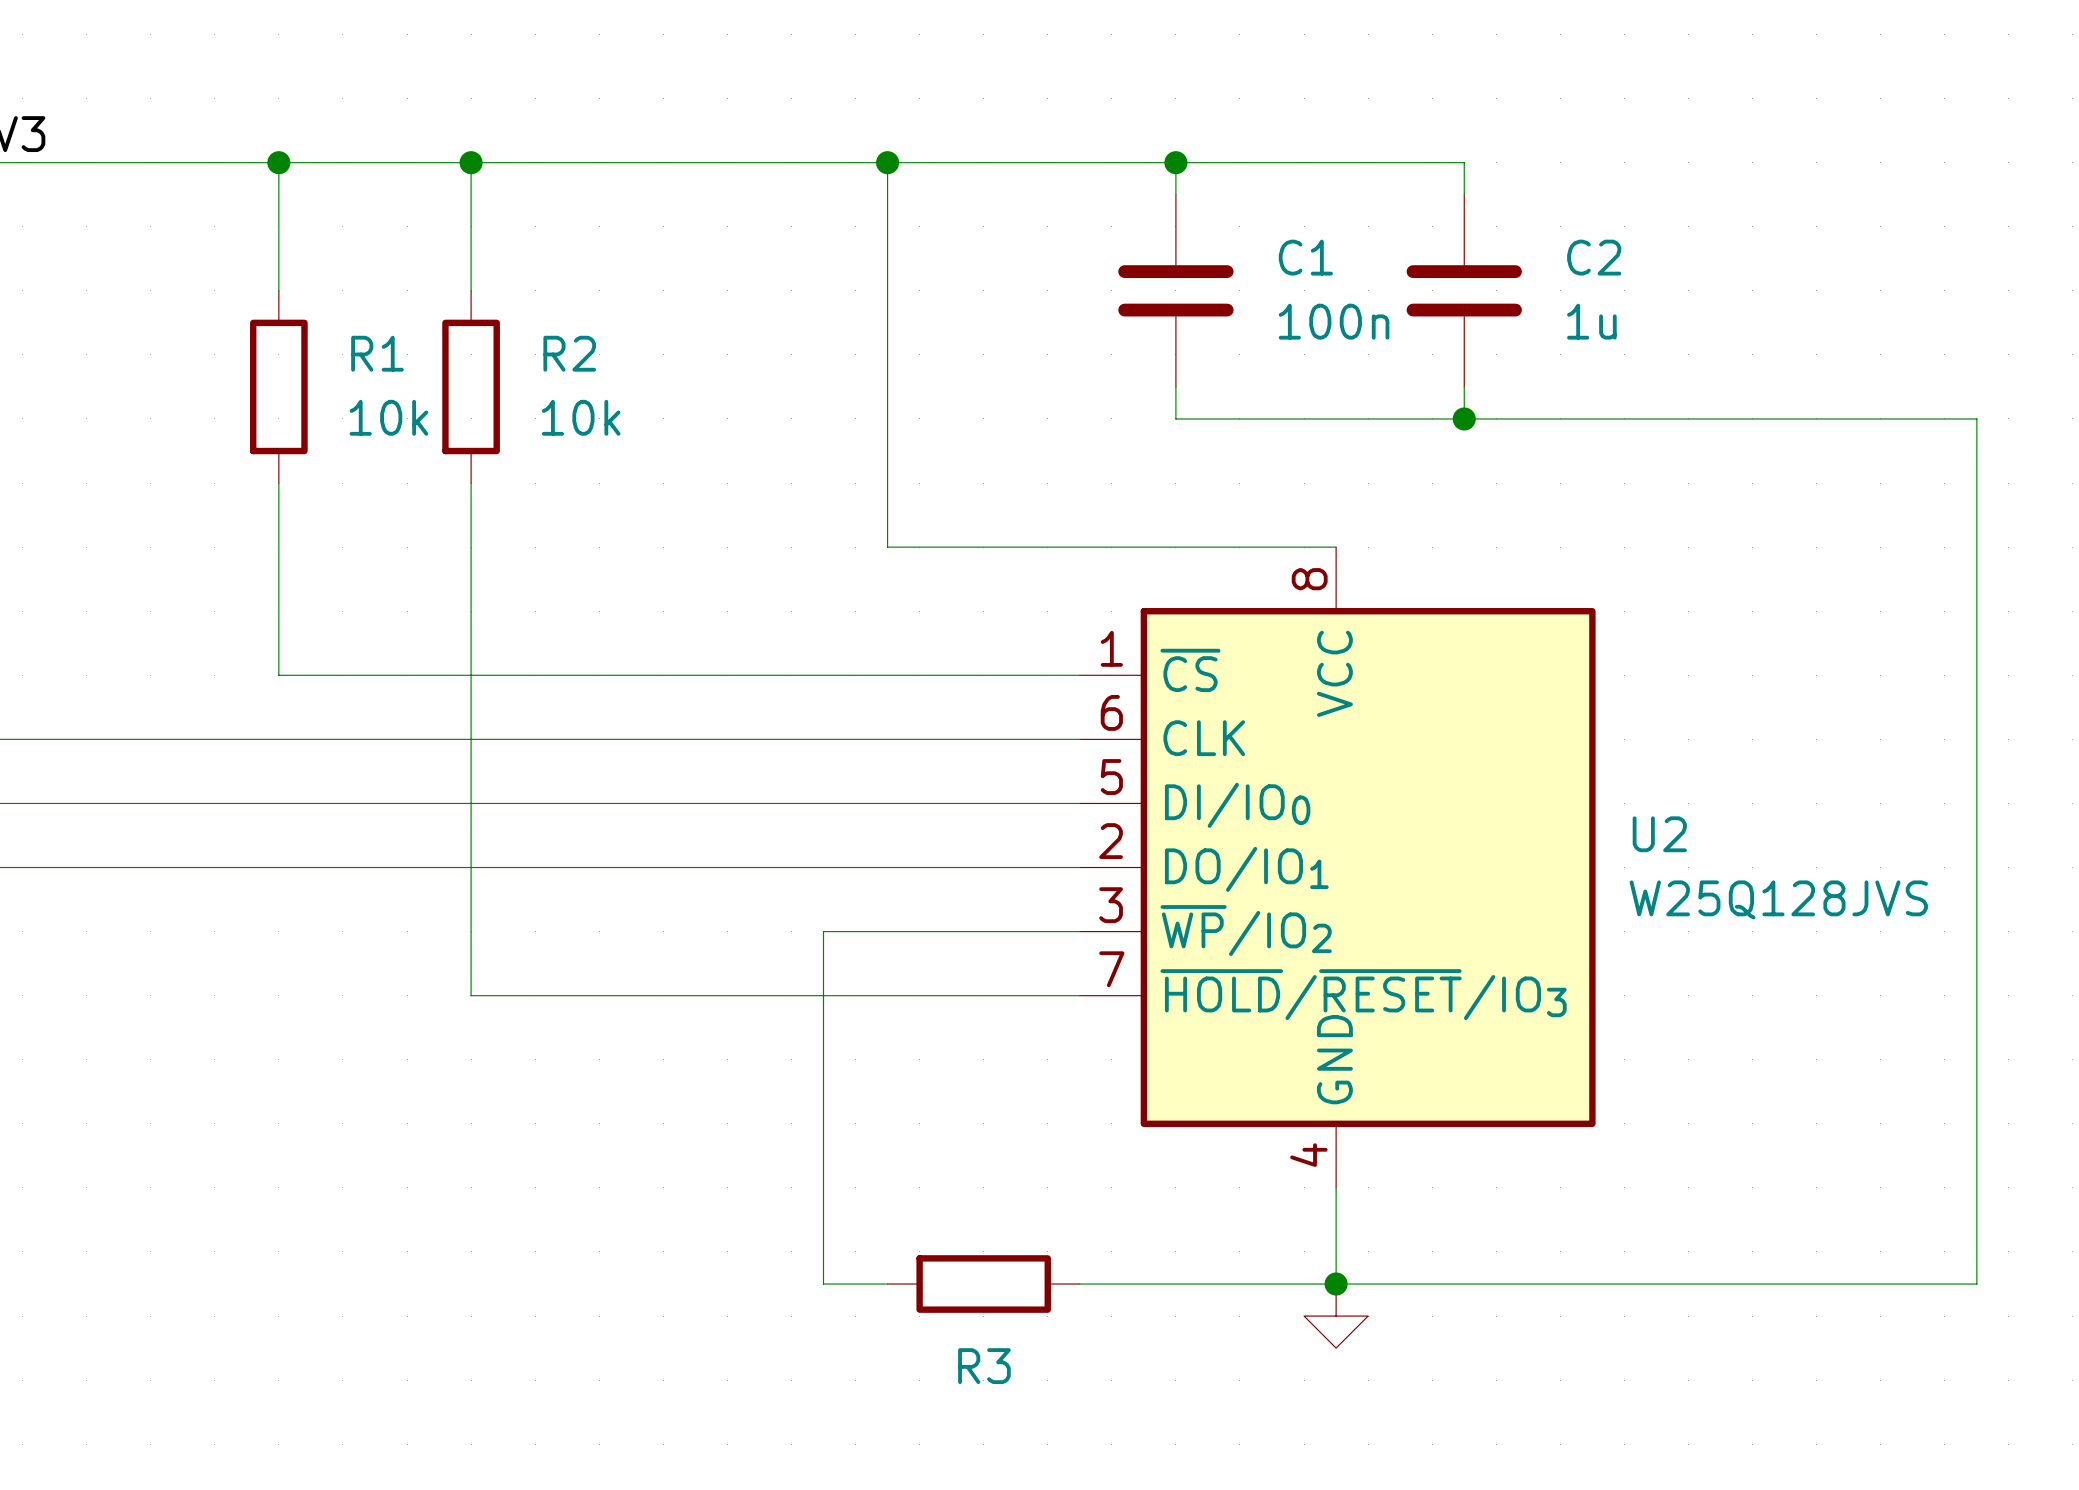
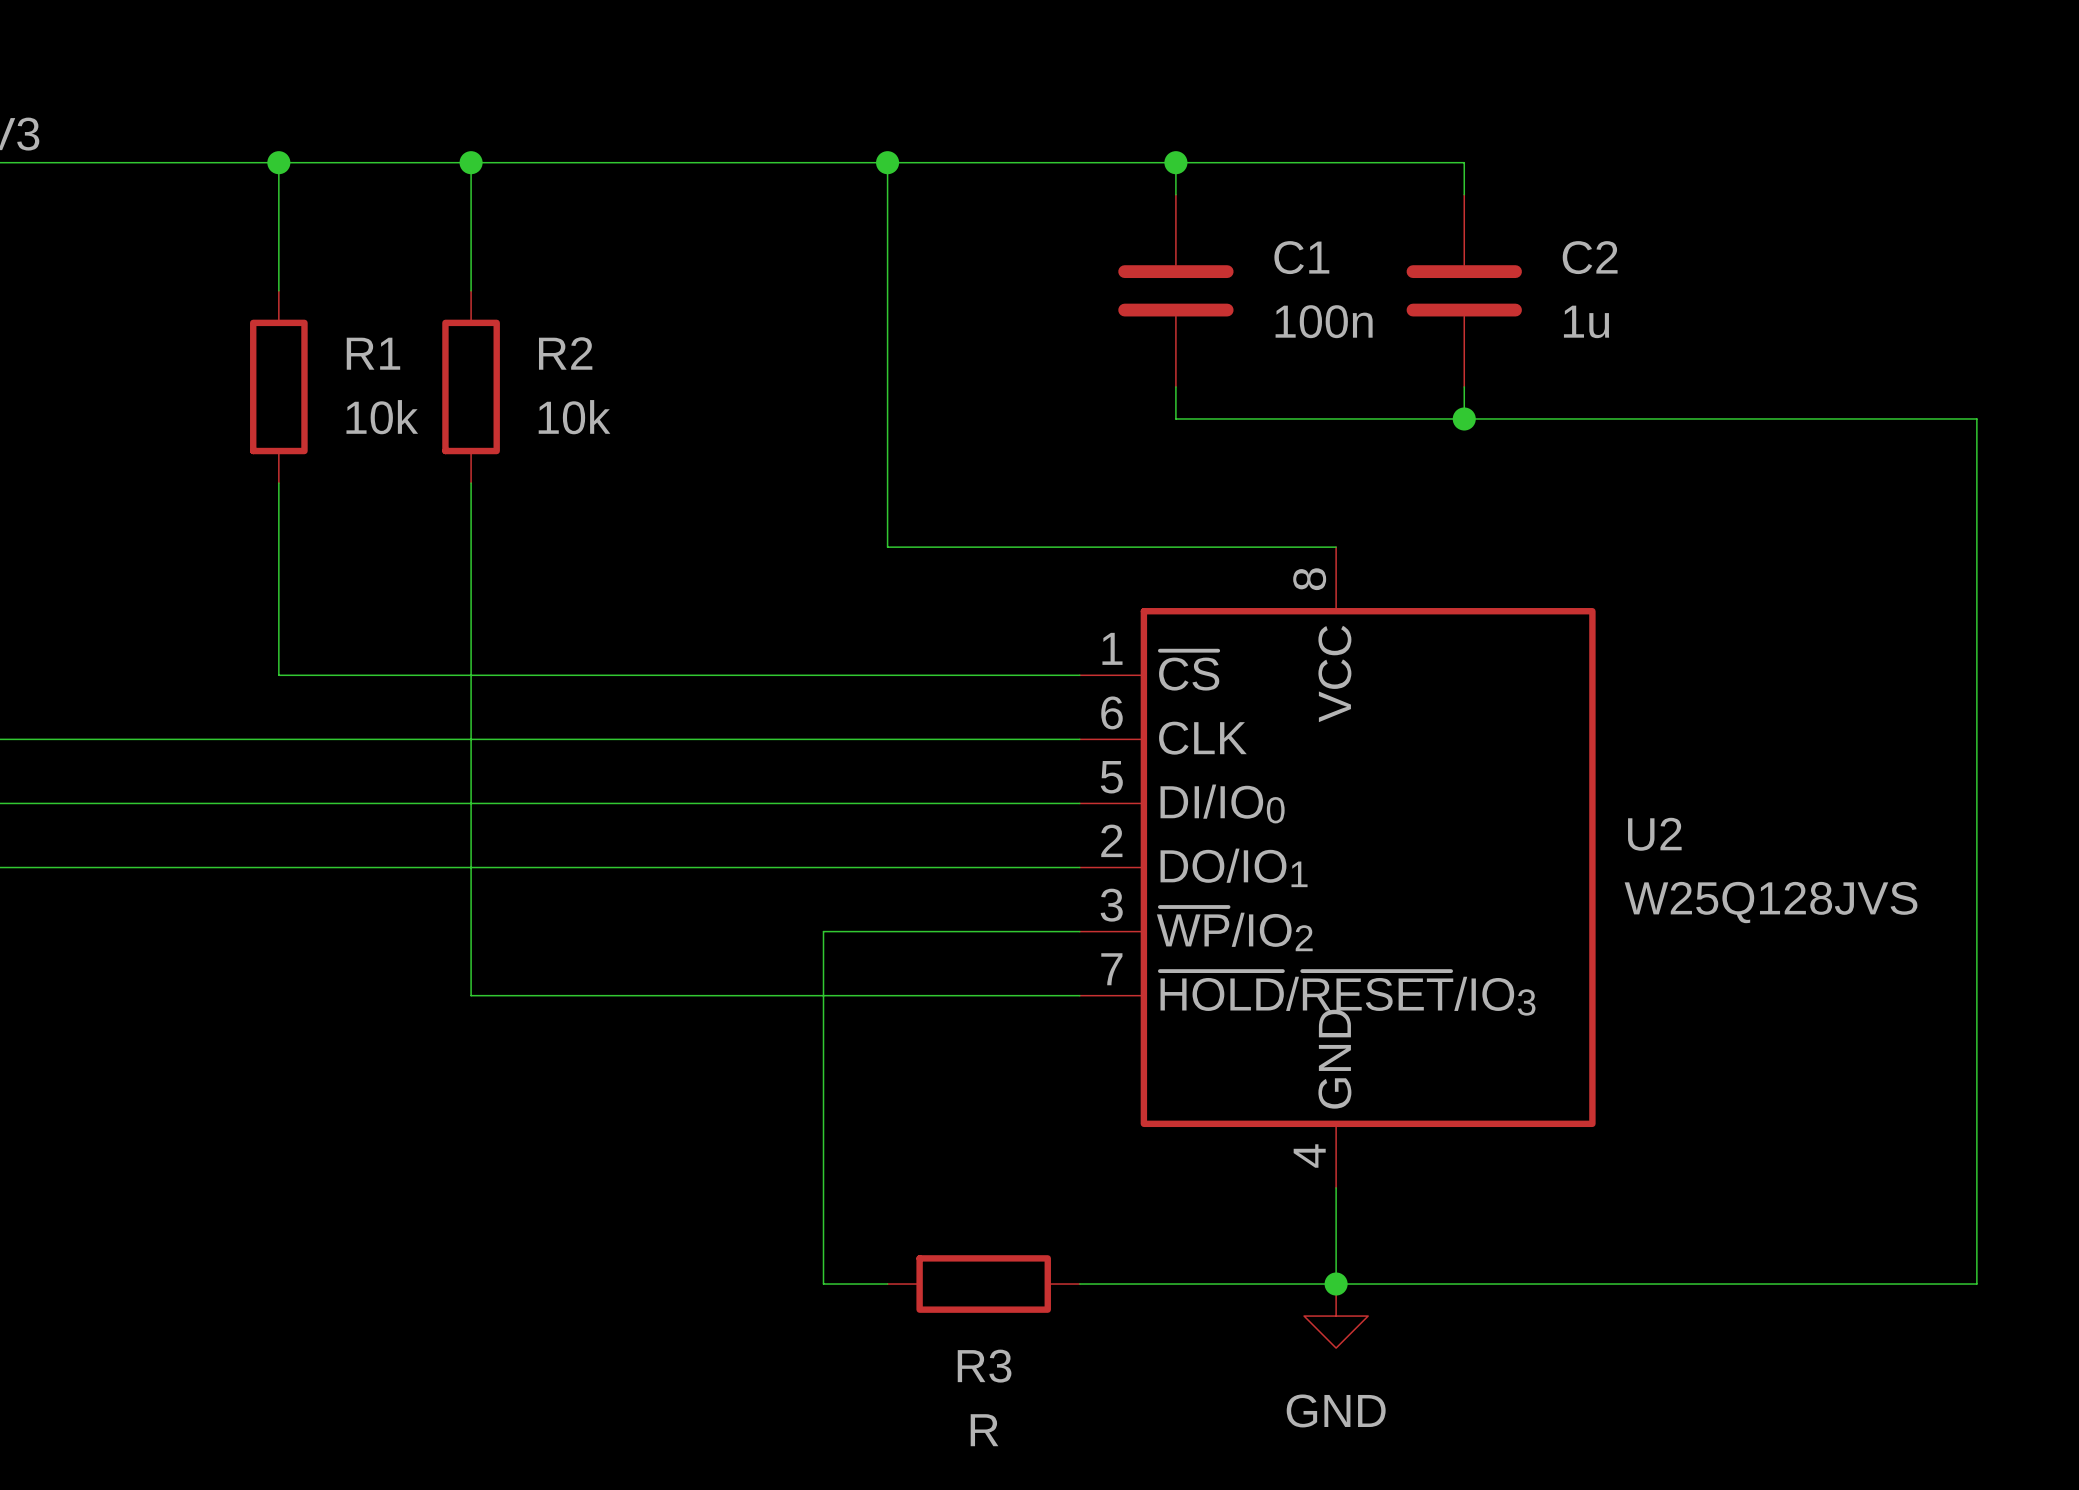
power symbol text: none -> GND (1336, 1410)
R3 value: none -> R (984, 1430)

